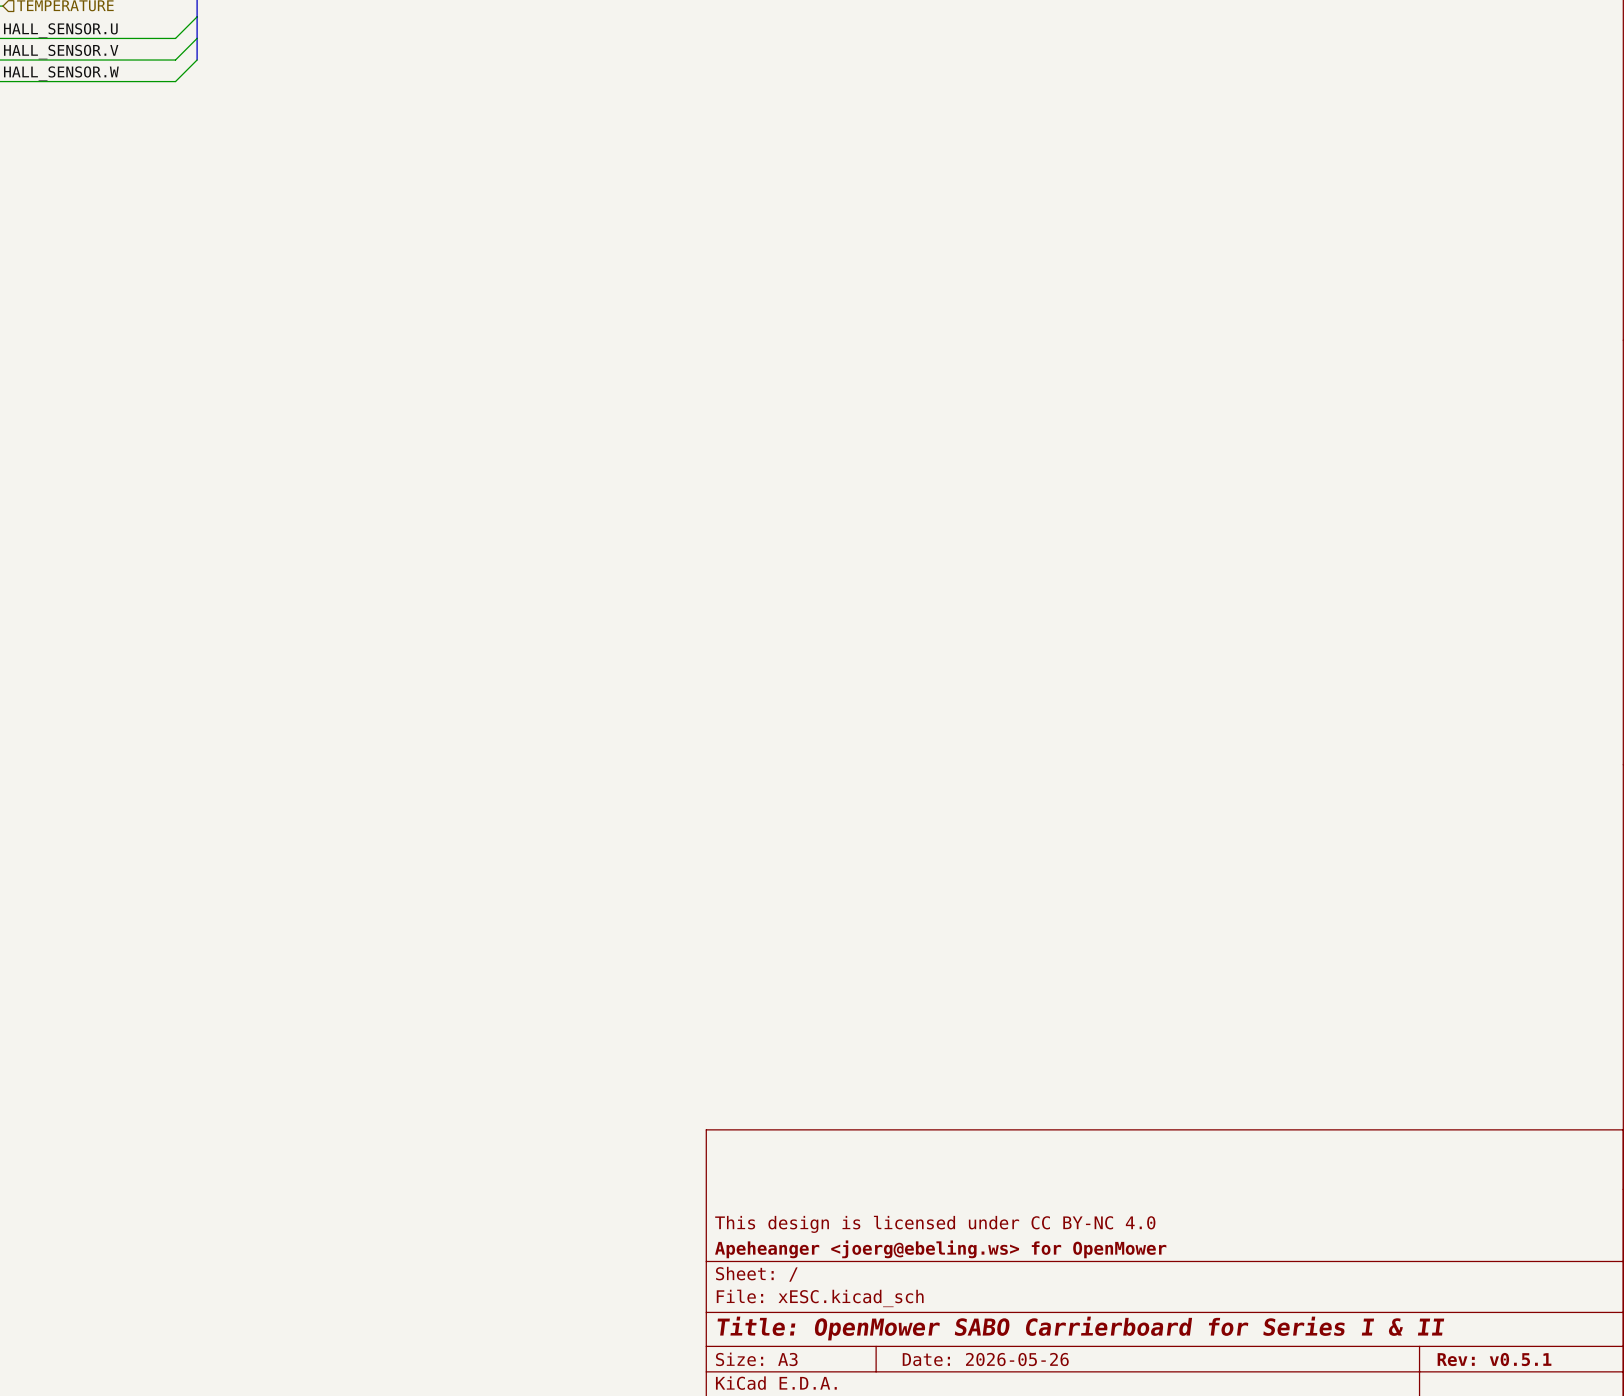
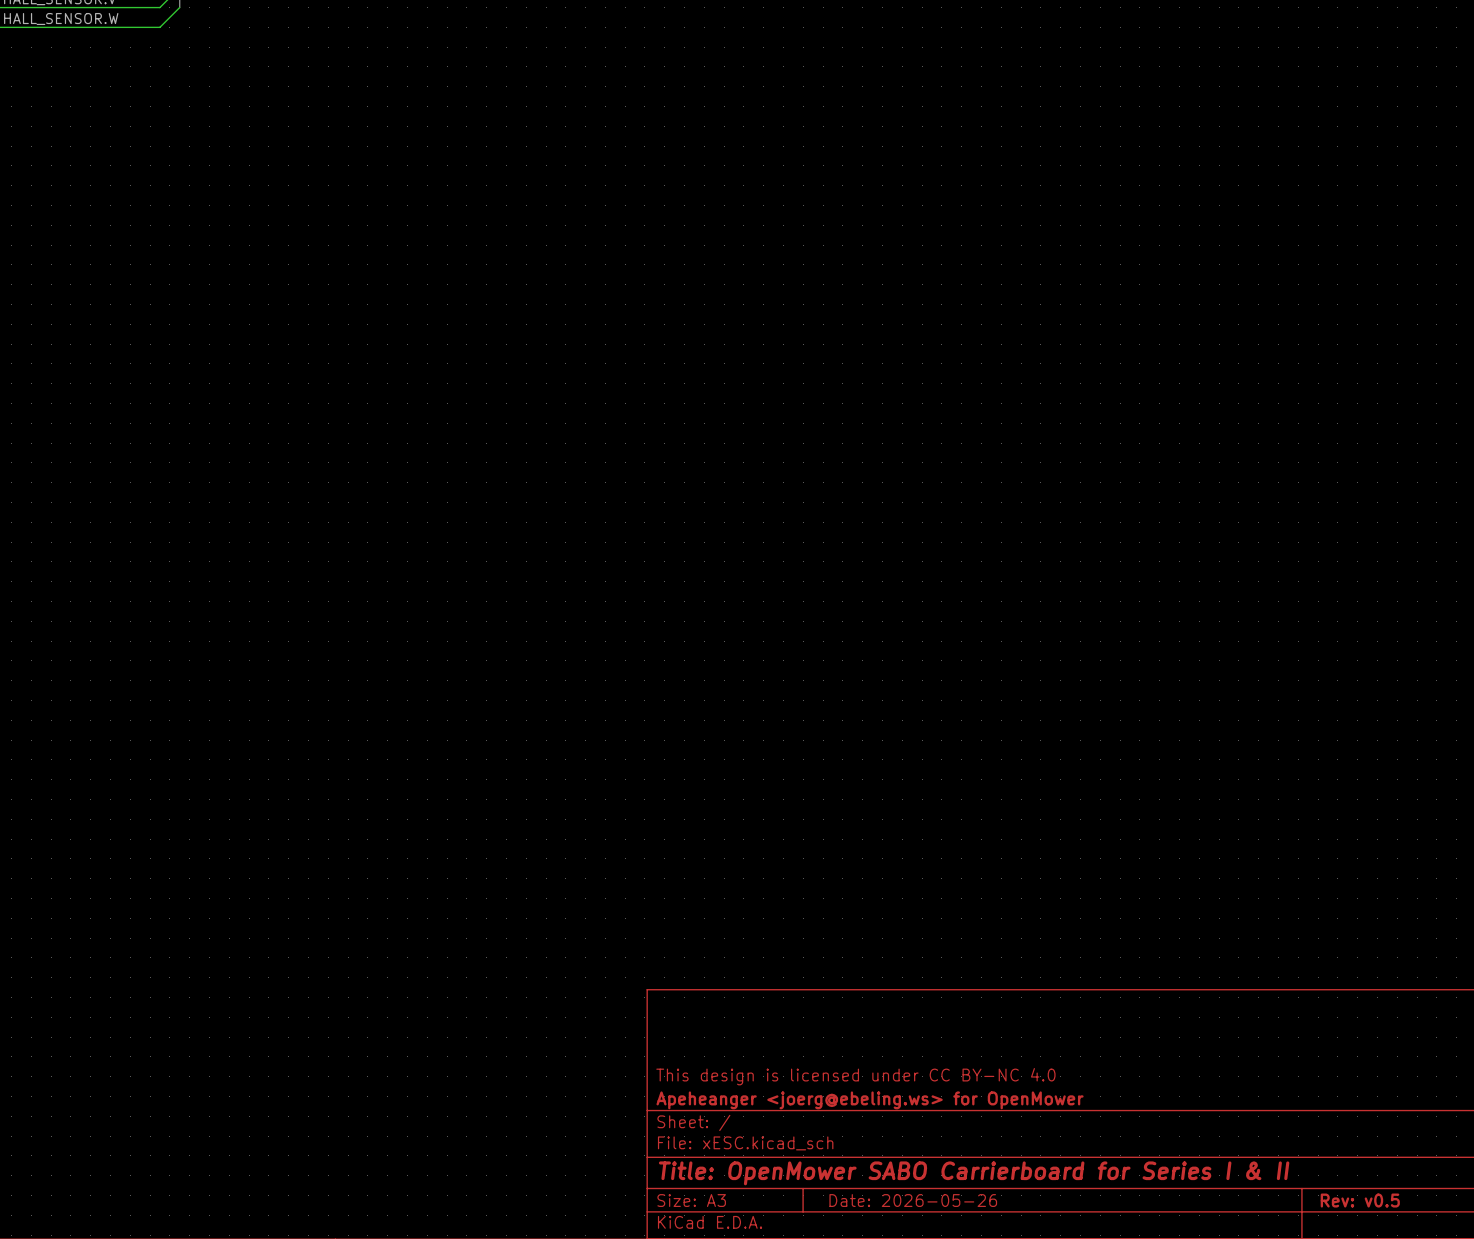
title block: Rev: v0.5.1 (1494, 1359) -> Rev: v0.5 (1360, 1200)

